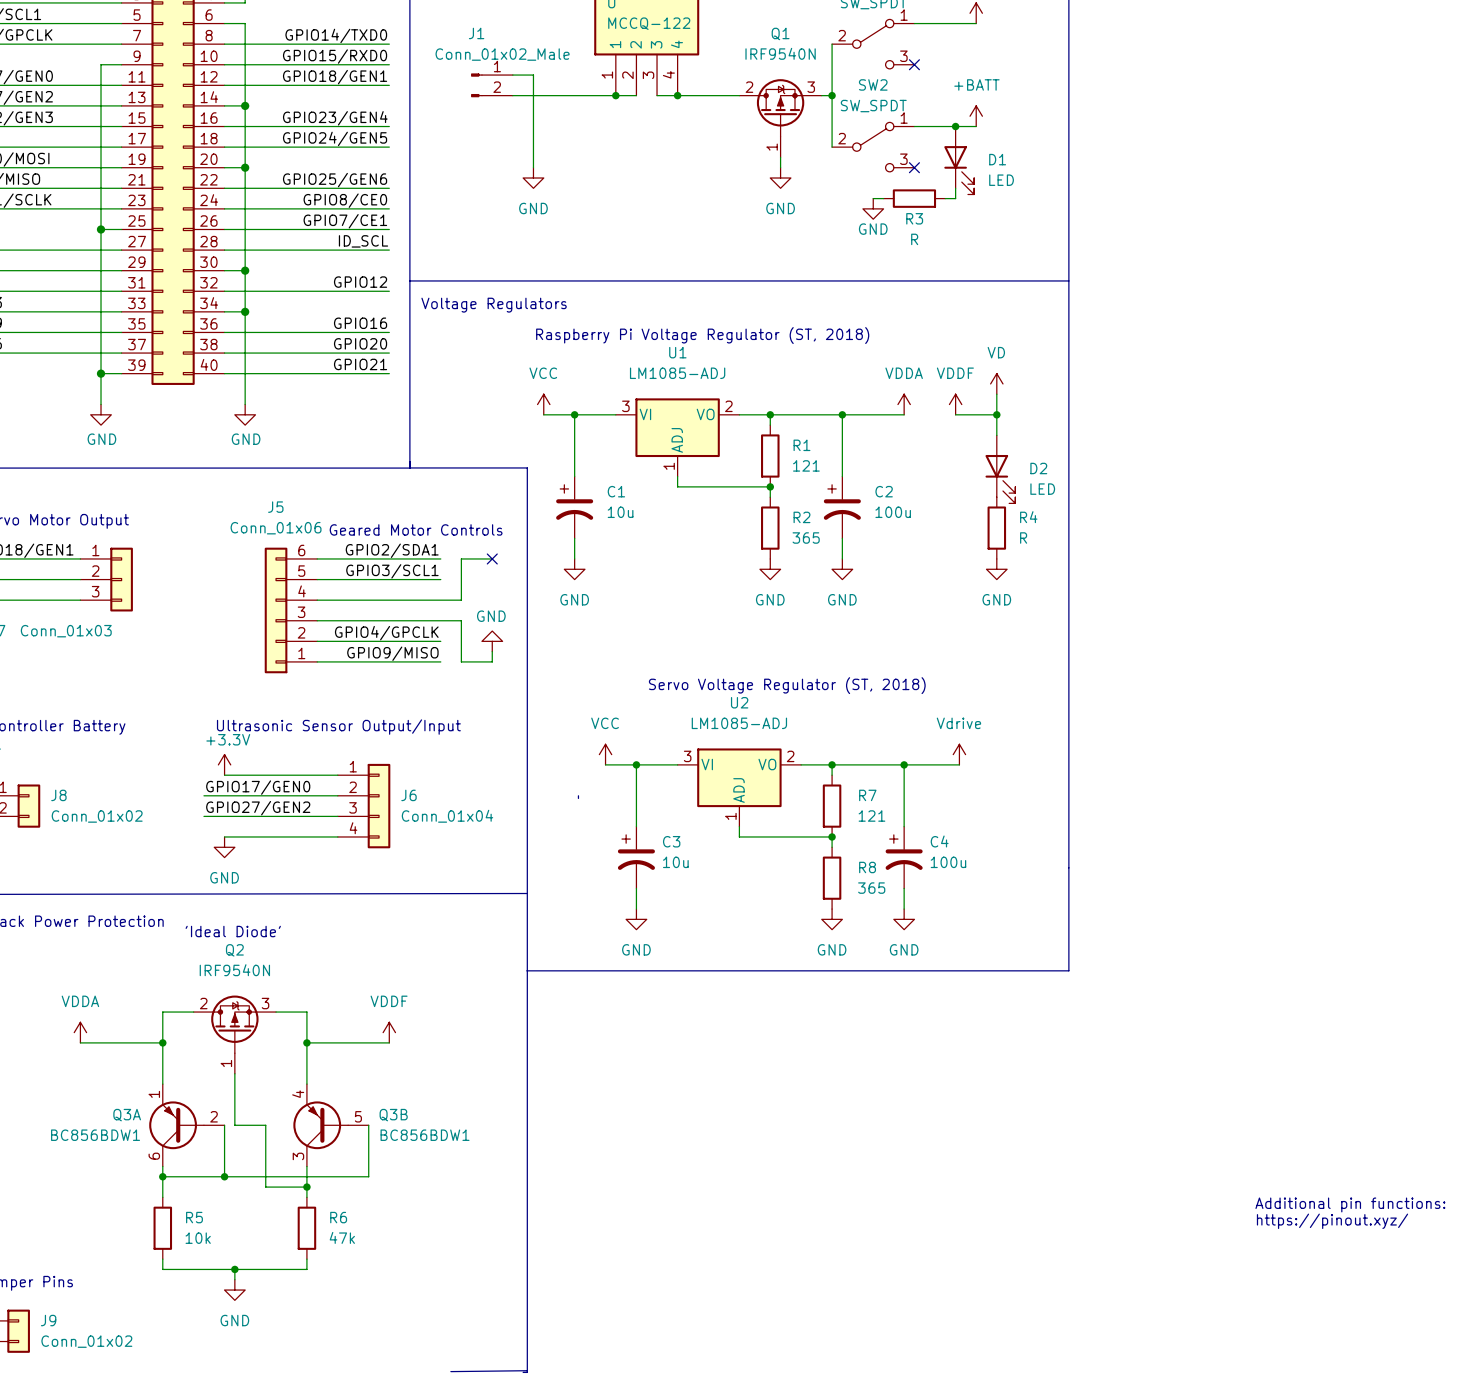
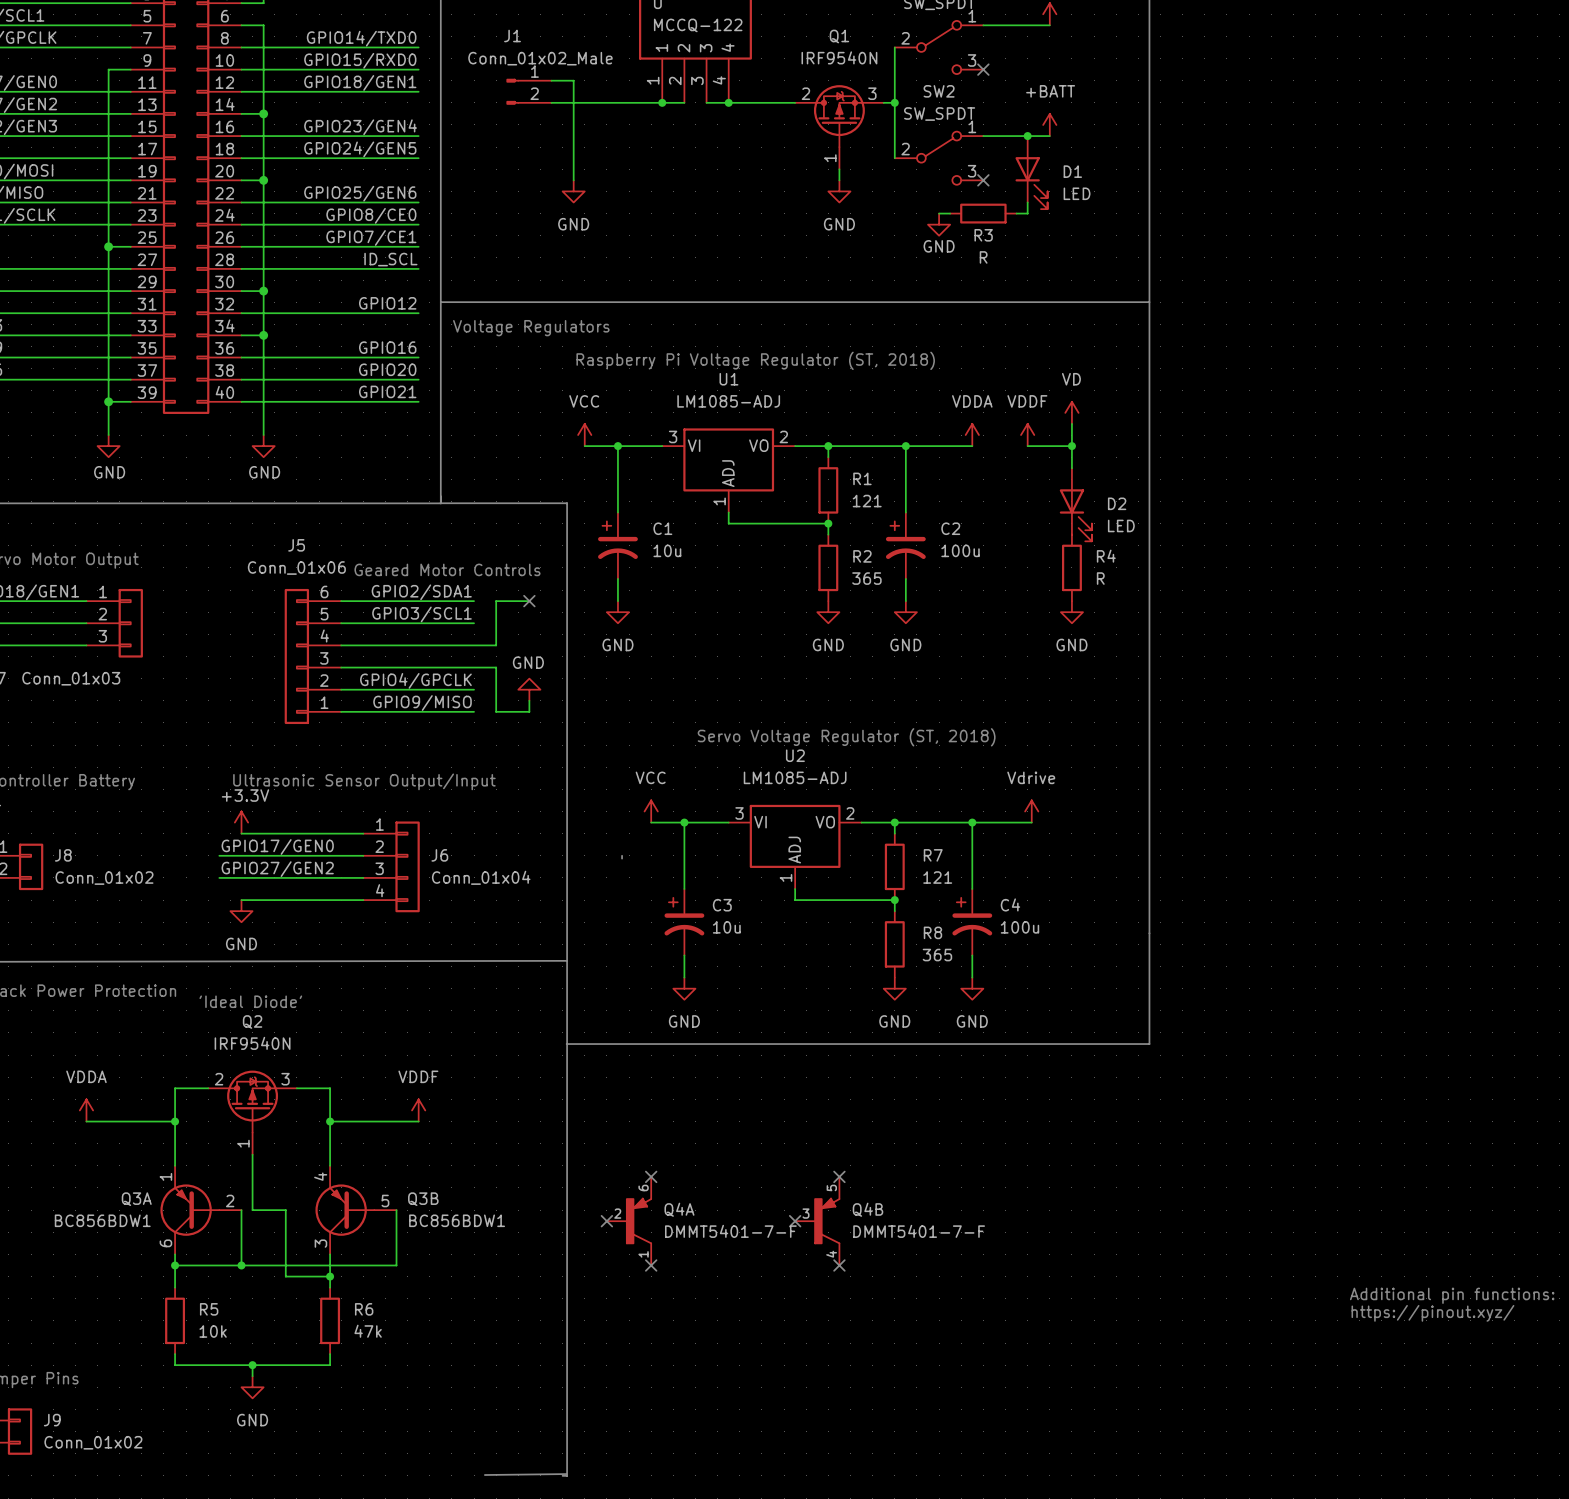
no-connect mark: none -> (651, 1176)
no-connect mark: none -> (839, 1176)
no-connect mark: none -> (606, 1221)
Q4A: none -> DMMT5401-7-F (629, 1221)
no-connect mark: none -> (795, 1221)
Q4B: none -> DMMT5401-7-F (817, 1221)
no-connect mark: none -> (651, 1265)
no-connect mark: none -> (839, 1265)

